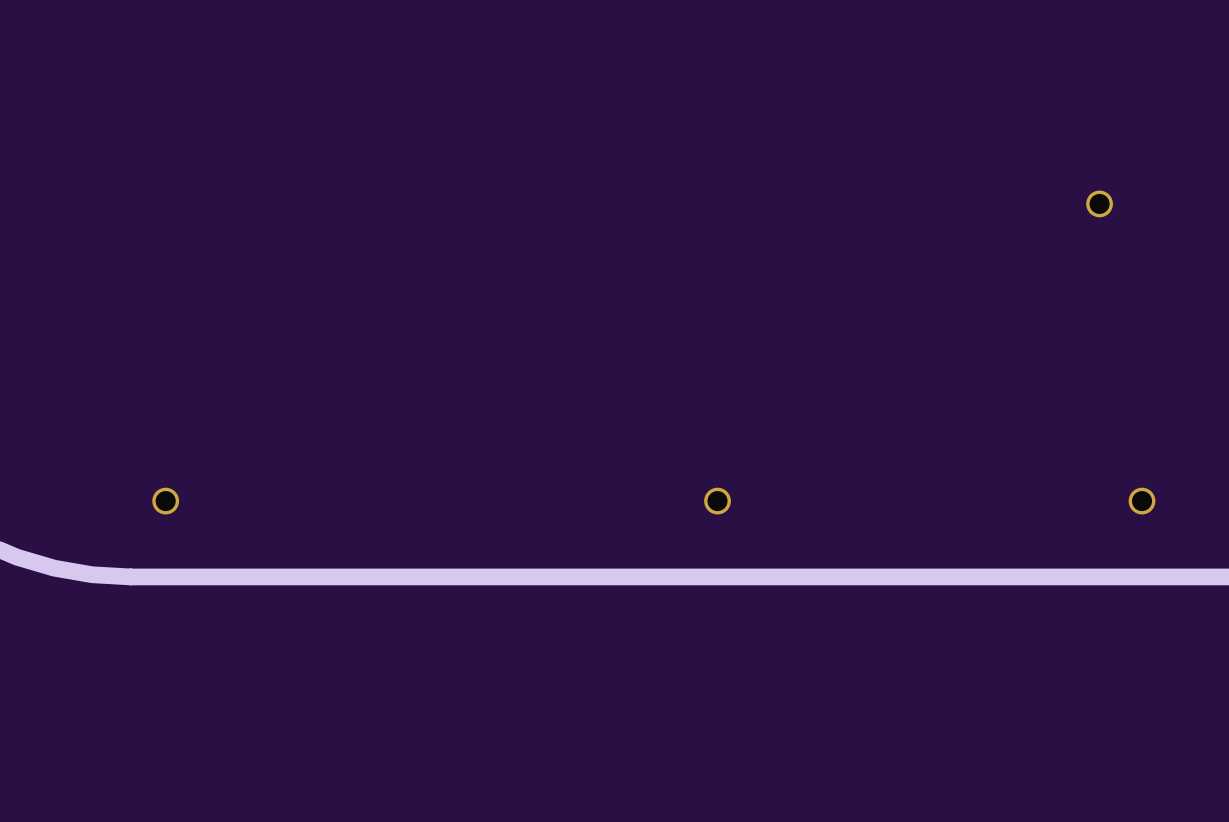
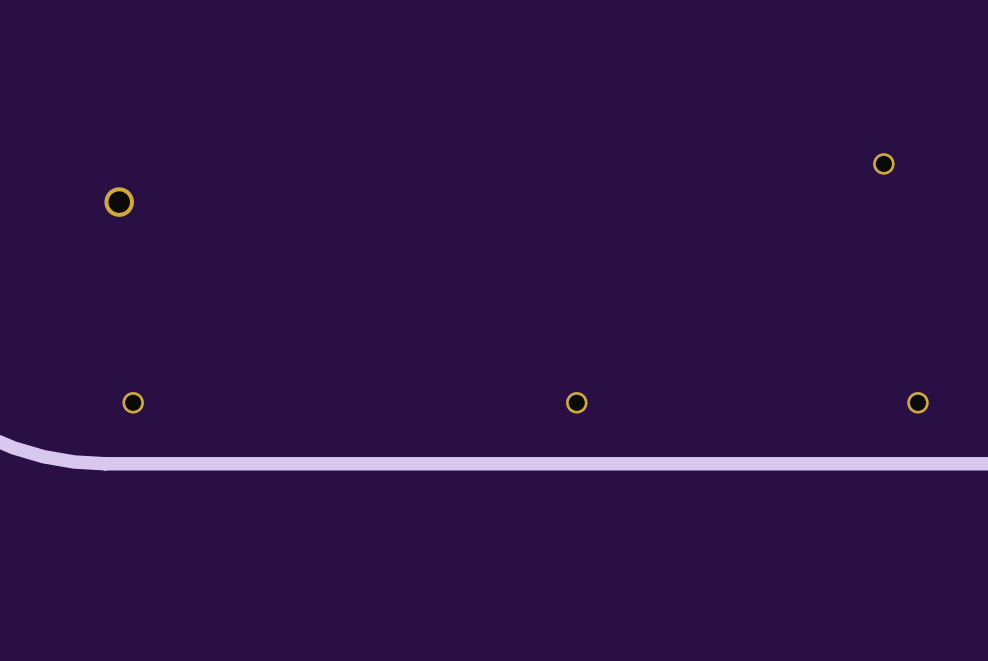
via: none -> (119, 202)

